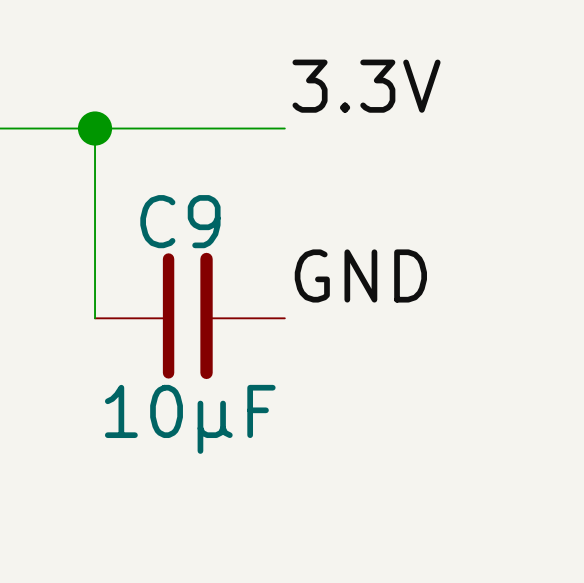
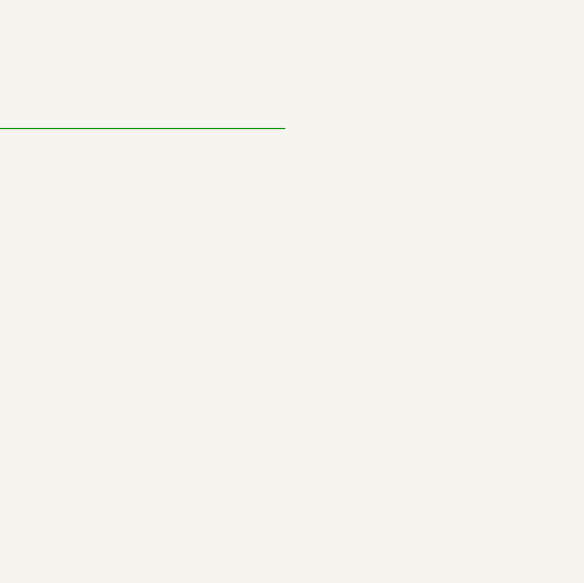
label: 3.3V (366, 86) -> none
wire: (95, 128) (95, 318) -> none
junction: (95, 128) -> none
label: GND (360, 275) -> none
C9: 10µF (189, 315) -> none

